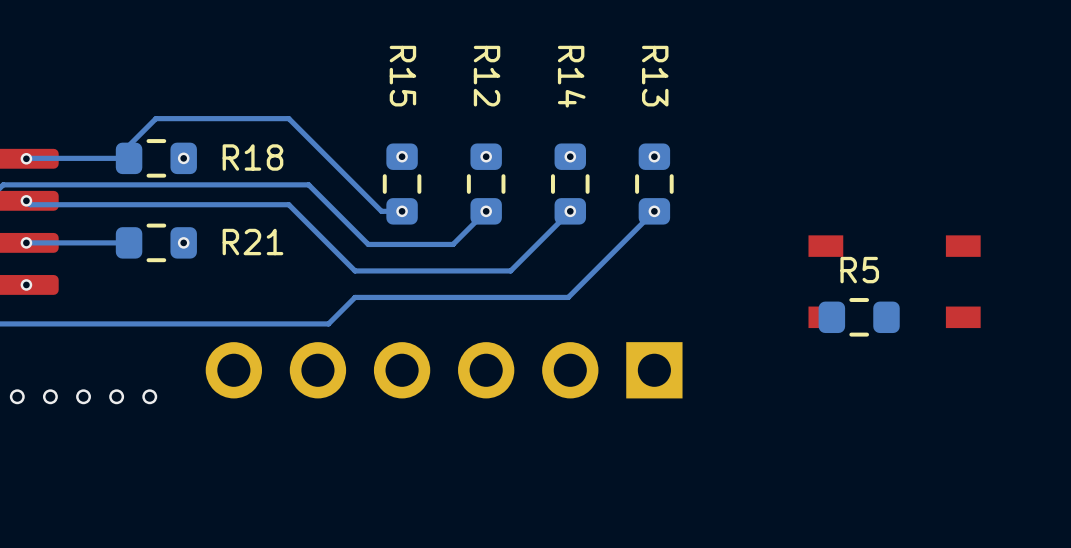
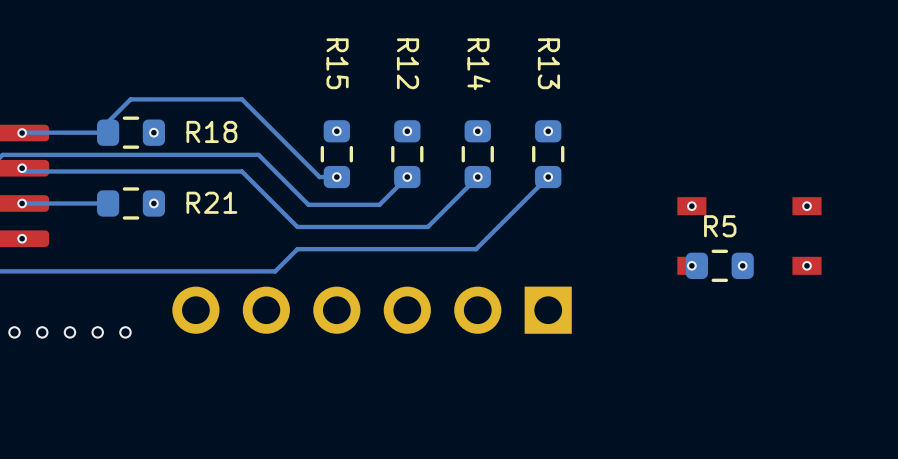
via: none -> (691, 206)
via: none -> (807, 206)
via: none -> (691, 265)
via: none -> (742, 265)
via: none -> (807, 265)

